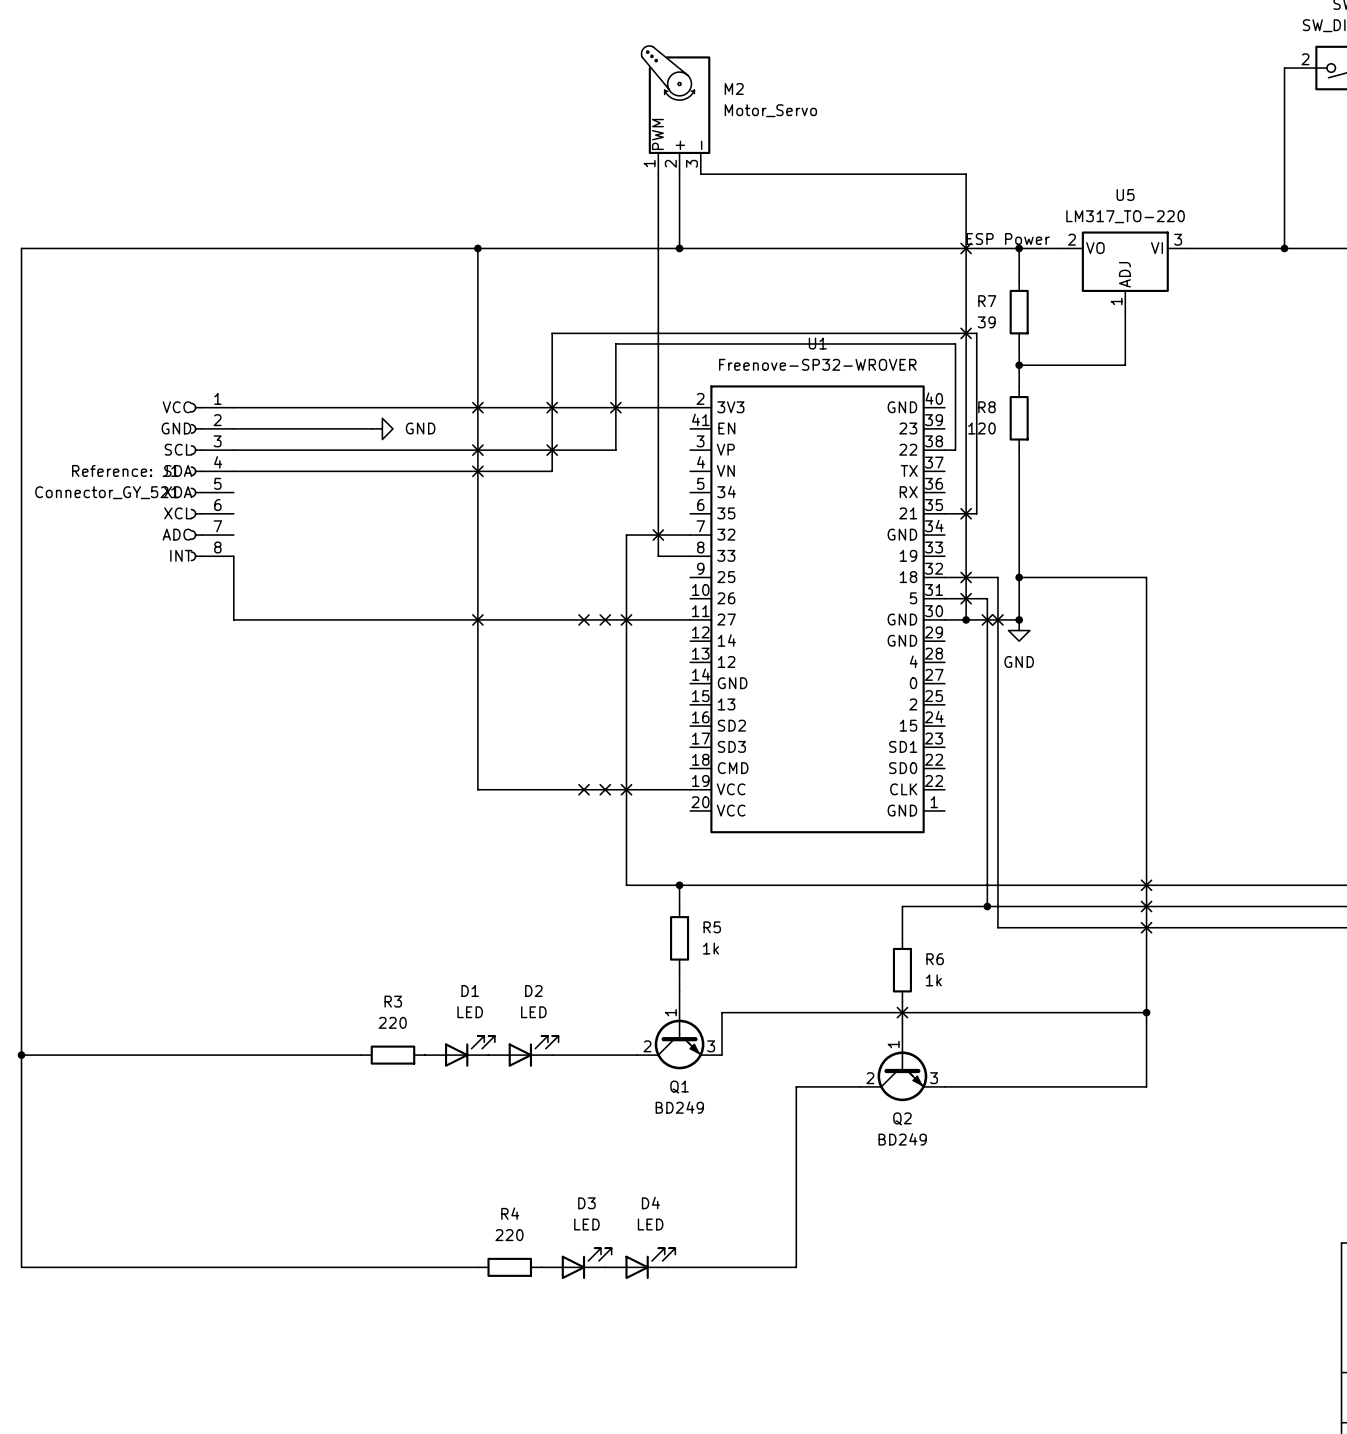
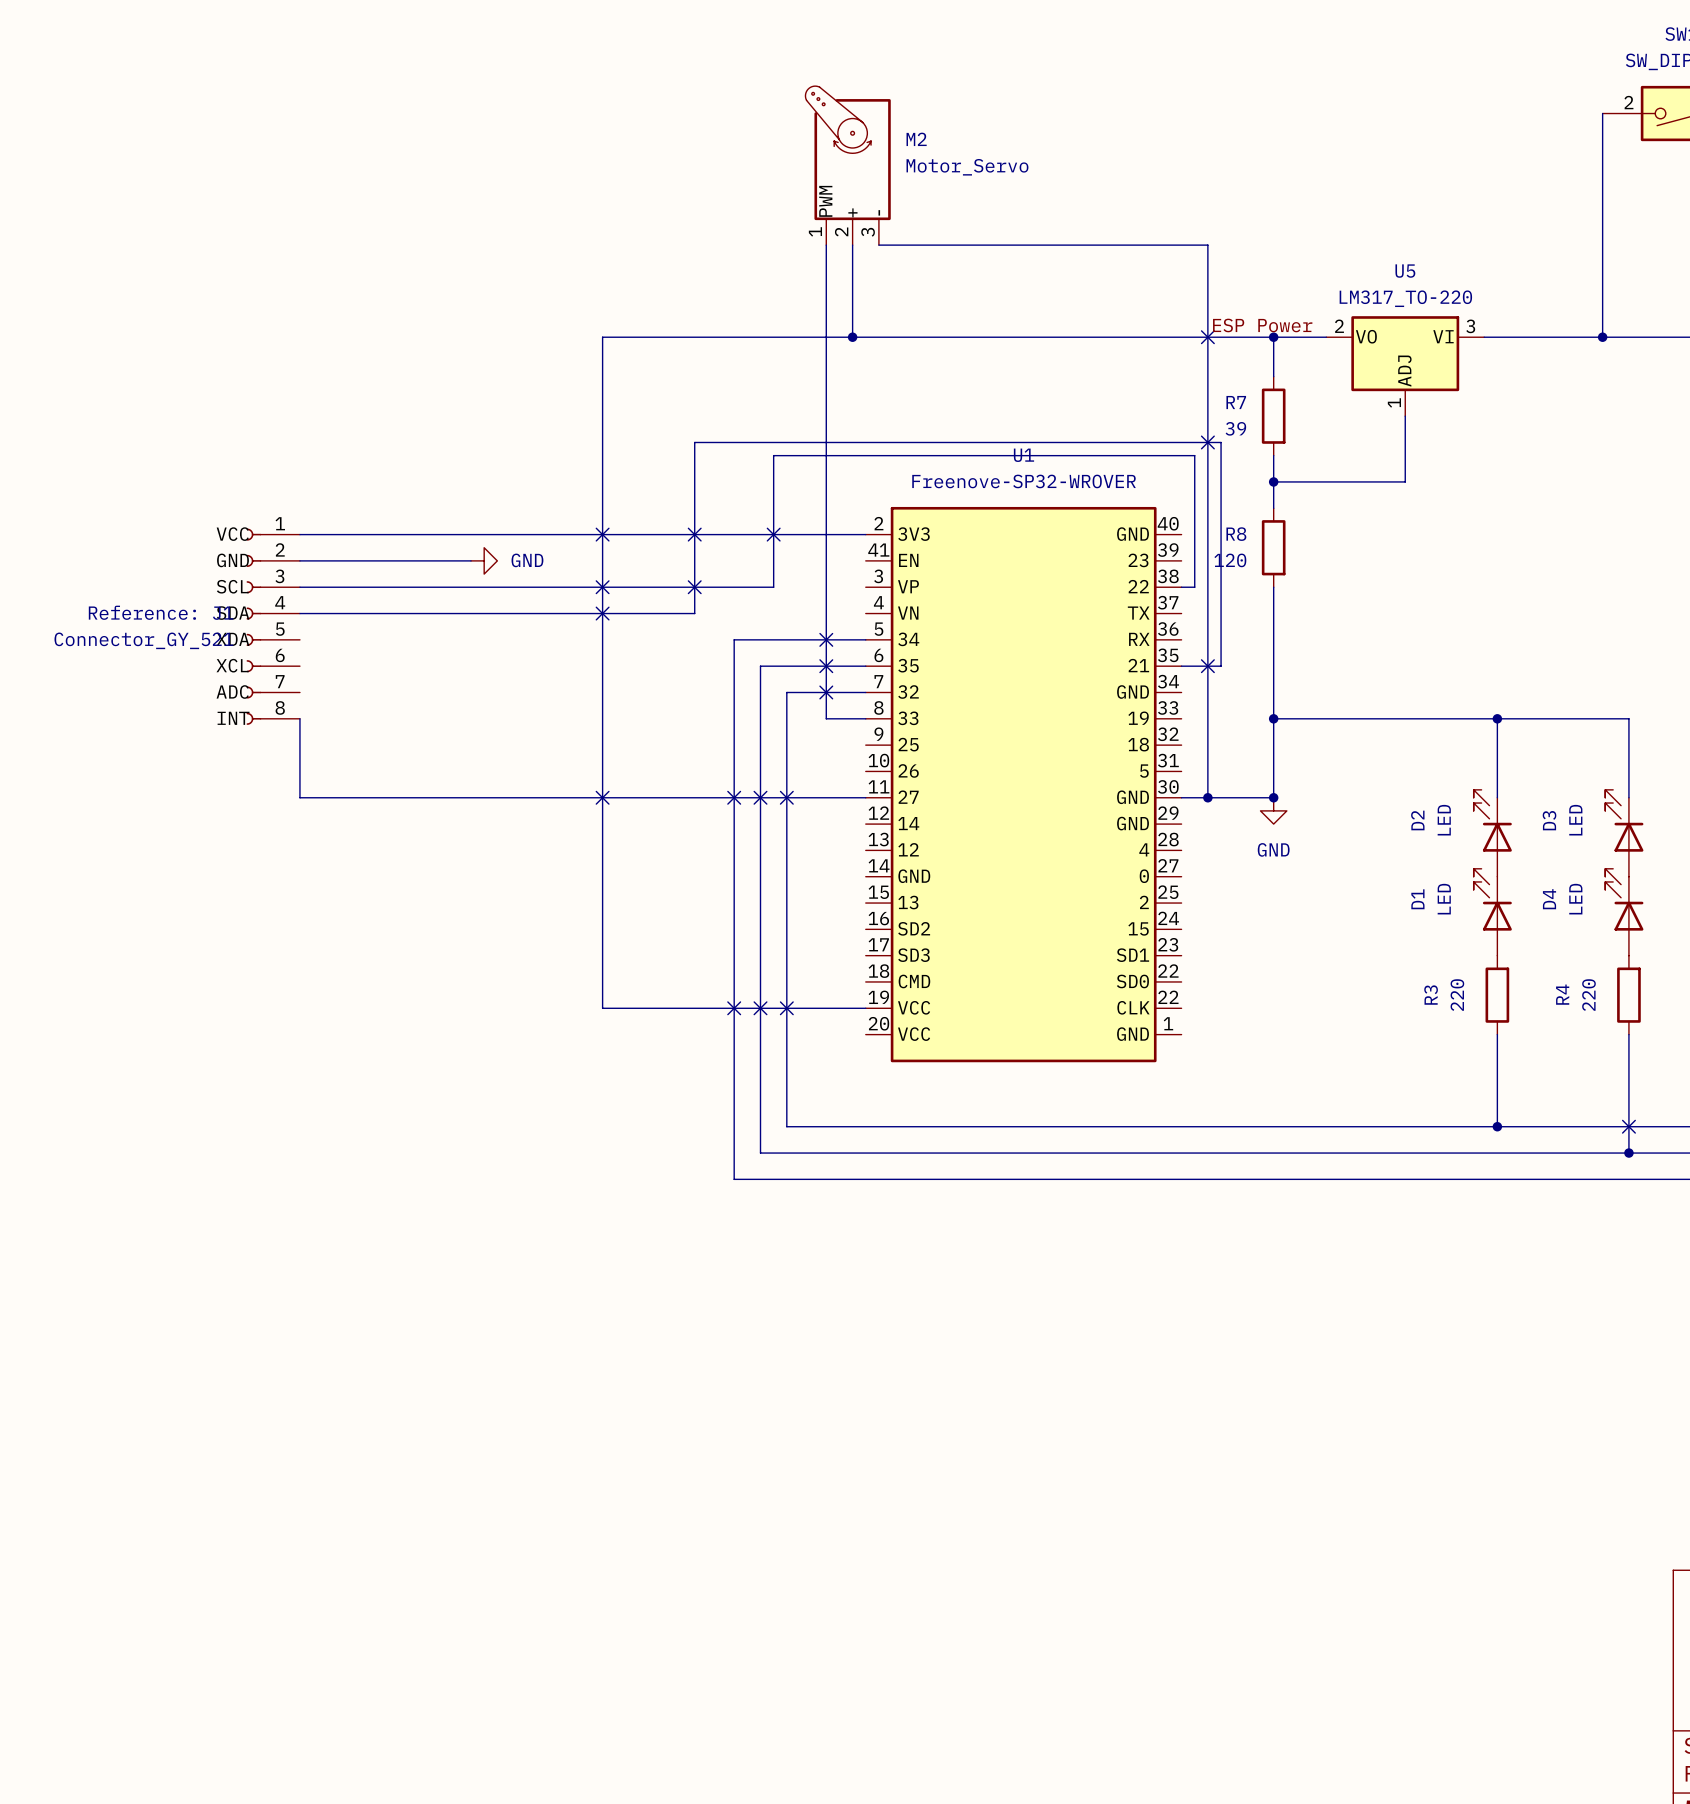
wire: (477, 248) (21, 248) (21, 1267) (477, 1267) -> none
junction: (477, 248) -> none
no-connect mark: none -> (826, 639)
no-connect mark: none -> (826, 666)
wire: none -> (1273, 718) (1628, 718) (1628, 797)
wire: none -> (1497, 718) (1497, 797)
junction: none -> (1497, 718)
wire: (944, 577) (997, 577) (997, 927) -> (865, 639) (734, 639) (734, 1179) (1247, 1179)
no-connect mark: (966, 577) -> none
wire: (1019, 577) (1146, 577) (1146, 1086) (944, 1086) -> none
junction position: (1019, 577) -> (1273, 718)
wire: (944, 598) (987, 598) (987, 906) -> none
no-connect mark: (966, 598) -> none
no-connect mark: (987, 619) -> none
no-connect mark: (997, 619) -> none
wire: none -> (1497, 1034) (1497, 1126)
wire: none -> (1628, 1034) (1628, 1153)
wire: (679, 885) (679, 906) -> none
junction: (679, 885) -> none
no-connect mark: (1146, 885) -> none
junction: none -> (1497, 1126)
no-connect mark: none -> (1628, 1126)
wire: (902, 906) (902, 938) -> (1128, 1153) (760, 1153) (760, 666) (865, 666)
junction: (987, 906) -> none
no-connect mark: (1146, 906) -> none
junction: none -> (1628, 1153)
no-connect mark: (1146, 927) -> none
R5: 1k (679, 938) -> none
wire: (679, 970) (679, 991) -> none
R6: 1k (902, 970) -> none
R3 name position: R3 (393, 1001) -> R3 (1431, 995)
wire: (902, 1002) (902, 1023) -> none
no-connect mark: (902, 1012) -> none
wire: (1146, 1012) (722, 1012) (722, 1055) -> none
junction: (1146, 1012) -> none
R3 value position: 220 (392, 1022) -> 220 (1457, 995)
Q1: BD249 (679, 1030) -> none
D1 position: (459, 1051) -> (1492, 912)
D1 rotation: 0° (469, 1051) -> 90° counterclockwise (1492, 899)
D2 position: (523, 1051) -> (1492, 833)
D2 rotation: 0° (533, 1051) -> 90° counterclockwise (1492, 820)
wire: (21, 1055) (361, 1055) -> none
junction: (21, 1055) -> none
R3 rotation: 0° (392, 1055) -> 90° clockwise (1497, 995)
R3 position: (392, 1055) -> (1497, 995)
wire: (552, 1055) (637, 1055) -> none
Q2: BD249 (902, 1062) -> none
wire: (859, 1086) (796, 1086) (796, 1267) (668, 1267) -> none
R4 name position: R4 (510, 1213) -> R4 (1562, 994)
R4 value position: 220 (509, 1235) -> 220 (1588, 995)
D3 position: (576, 1263) -> (1624, 833)
D3 rotation: 0° (586, 1263) -> 90° counterclockwise (1624, 820)
D4 position: (640, 1263) -> (1624, 912)
D4 rotation: 0° (650, 1263) -> 90° counterclockwise (1624, 899)
R4 rotation: 0° (509, 1267) -> 90° clockwise (1628, 995)
R4 position: (509, 1267) -> (1628, 995)

